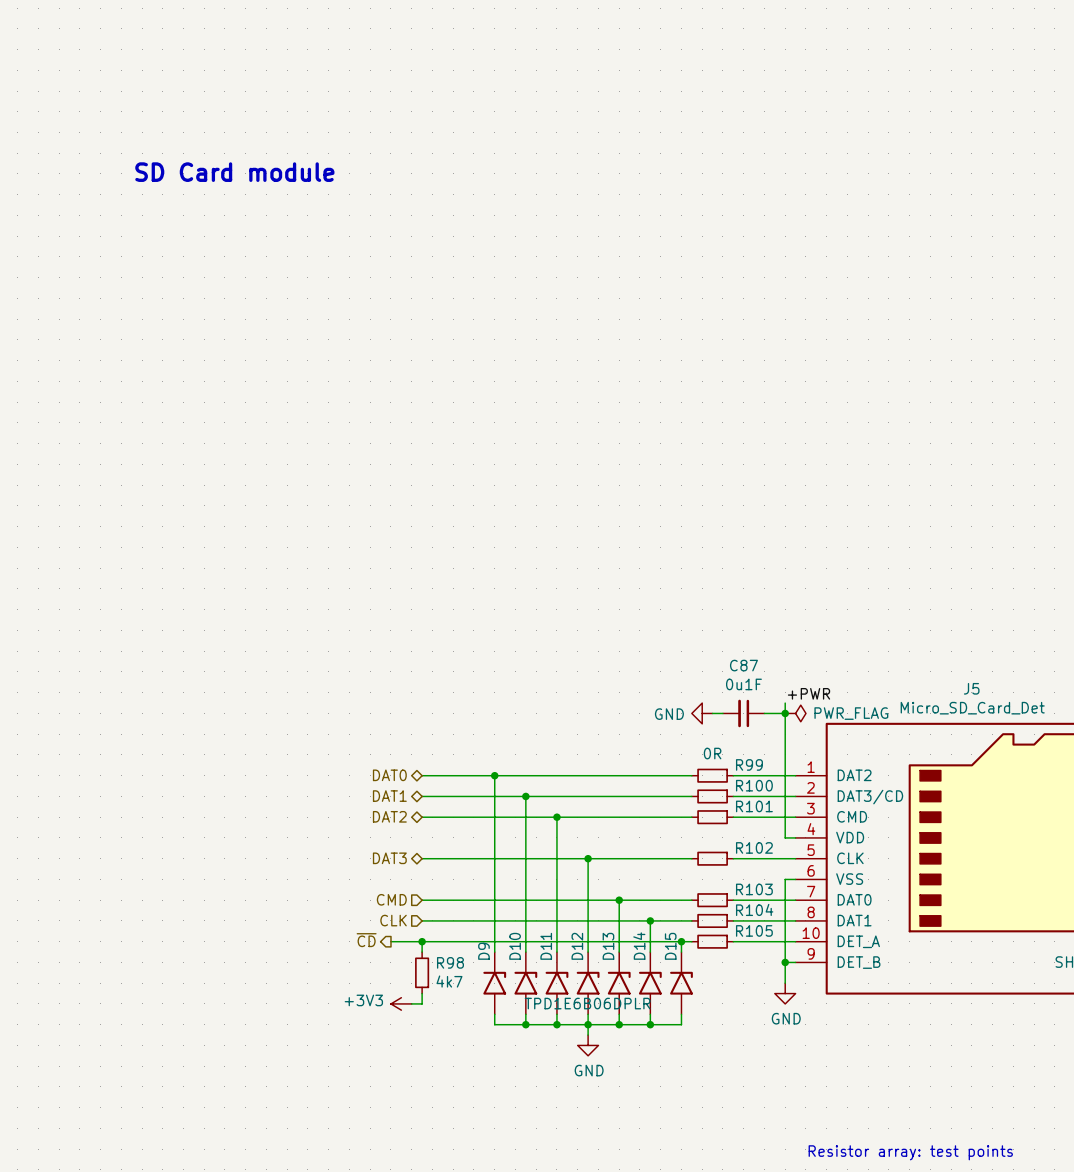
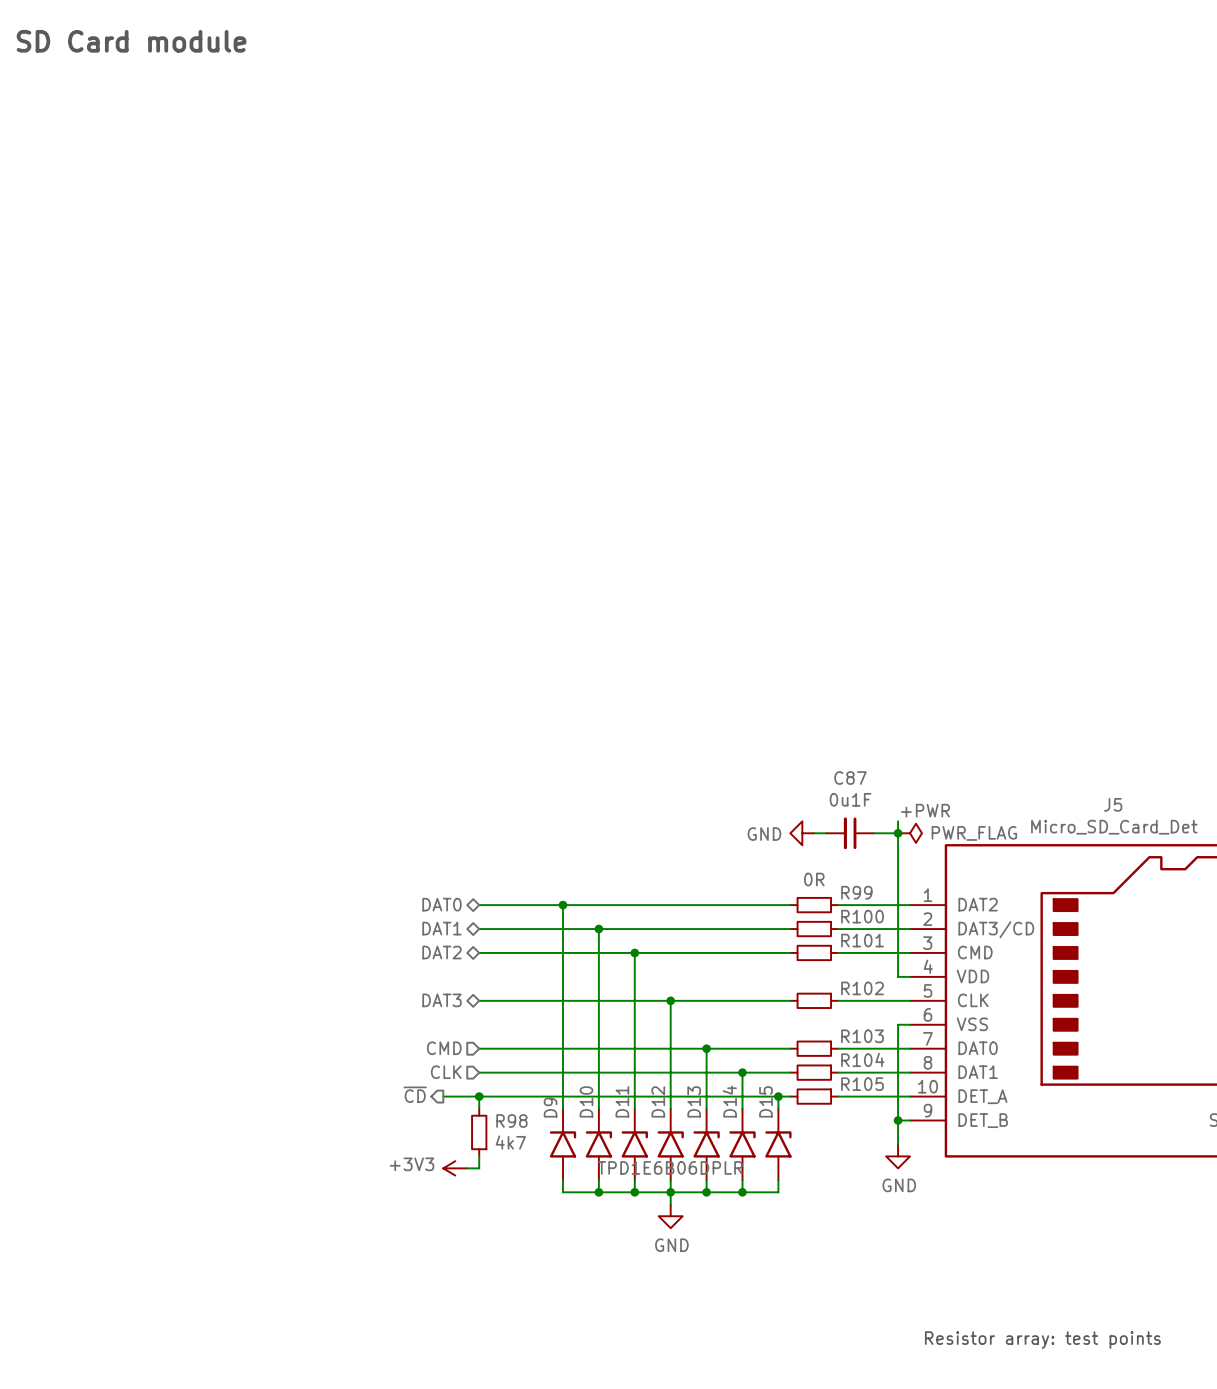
text position: SD Card module (234, 172) -> SD Card module (131, 41)

